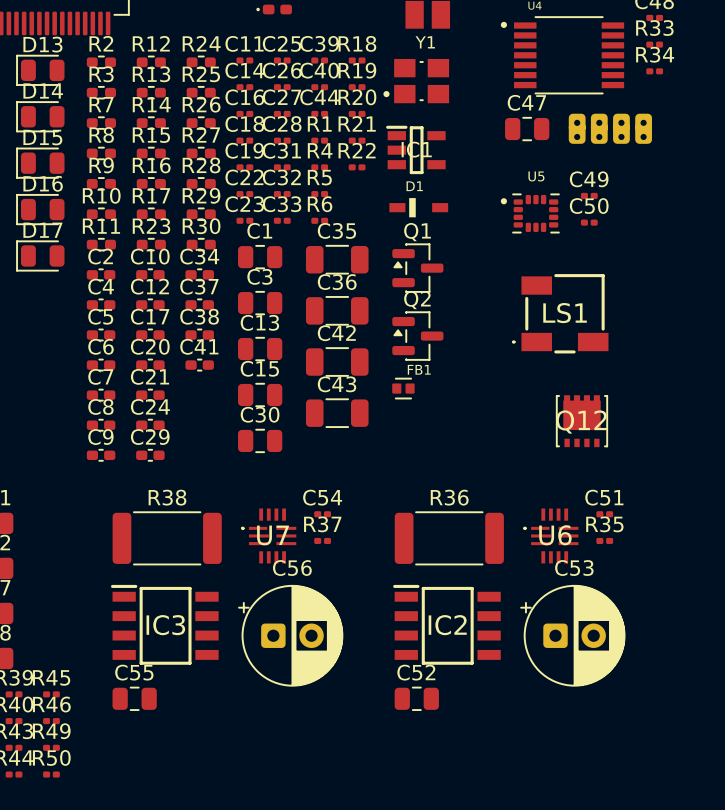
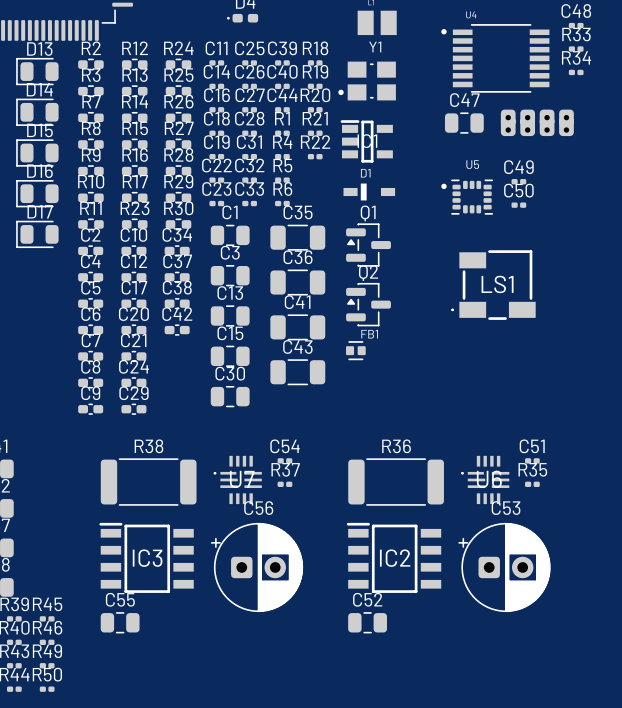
C42 name: C42 (336, 333) -> C41 (297, 302)
C41 name: C41 (199, 346) -> C42 (177, 314)
Q12: (581, 421) -> none

